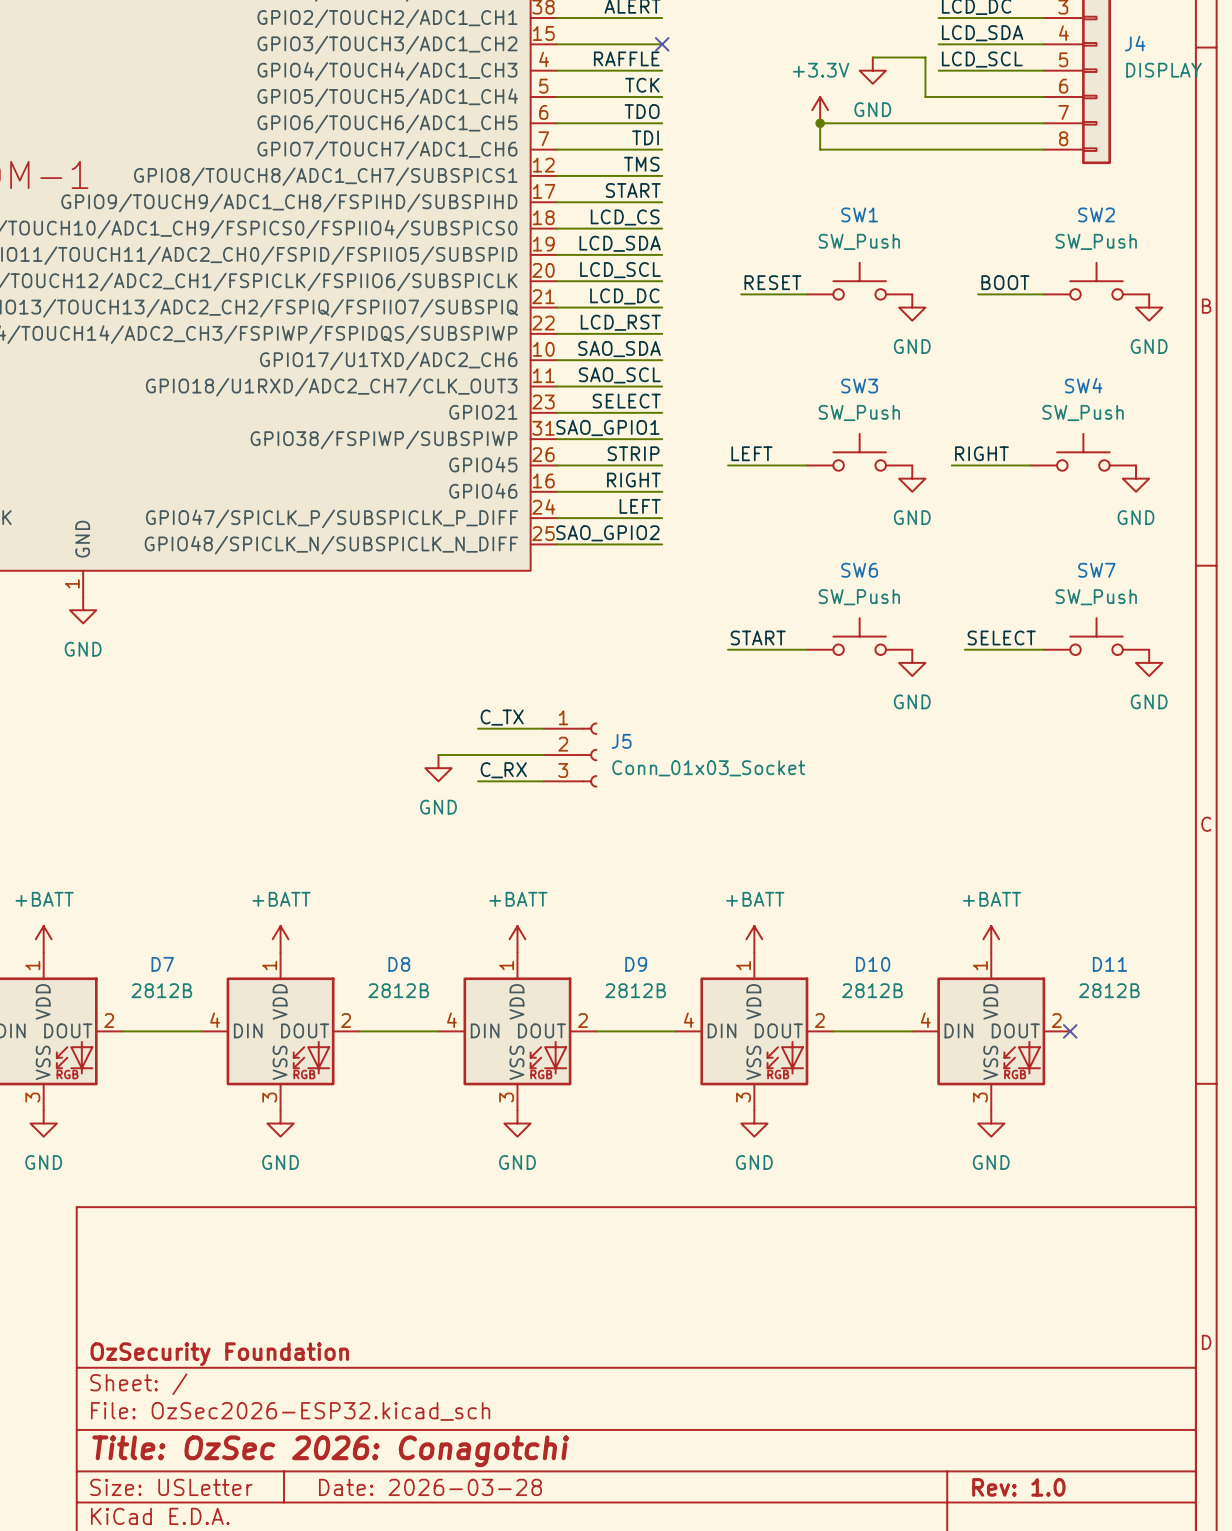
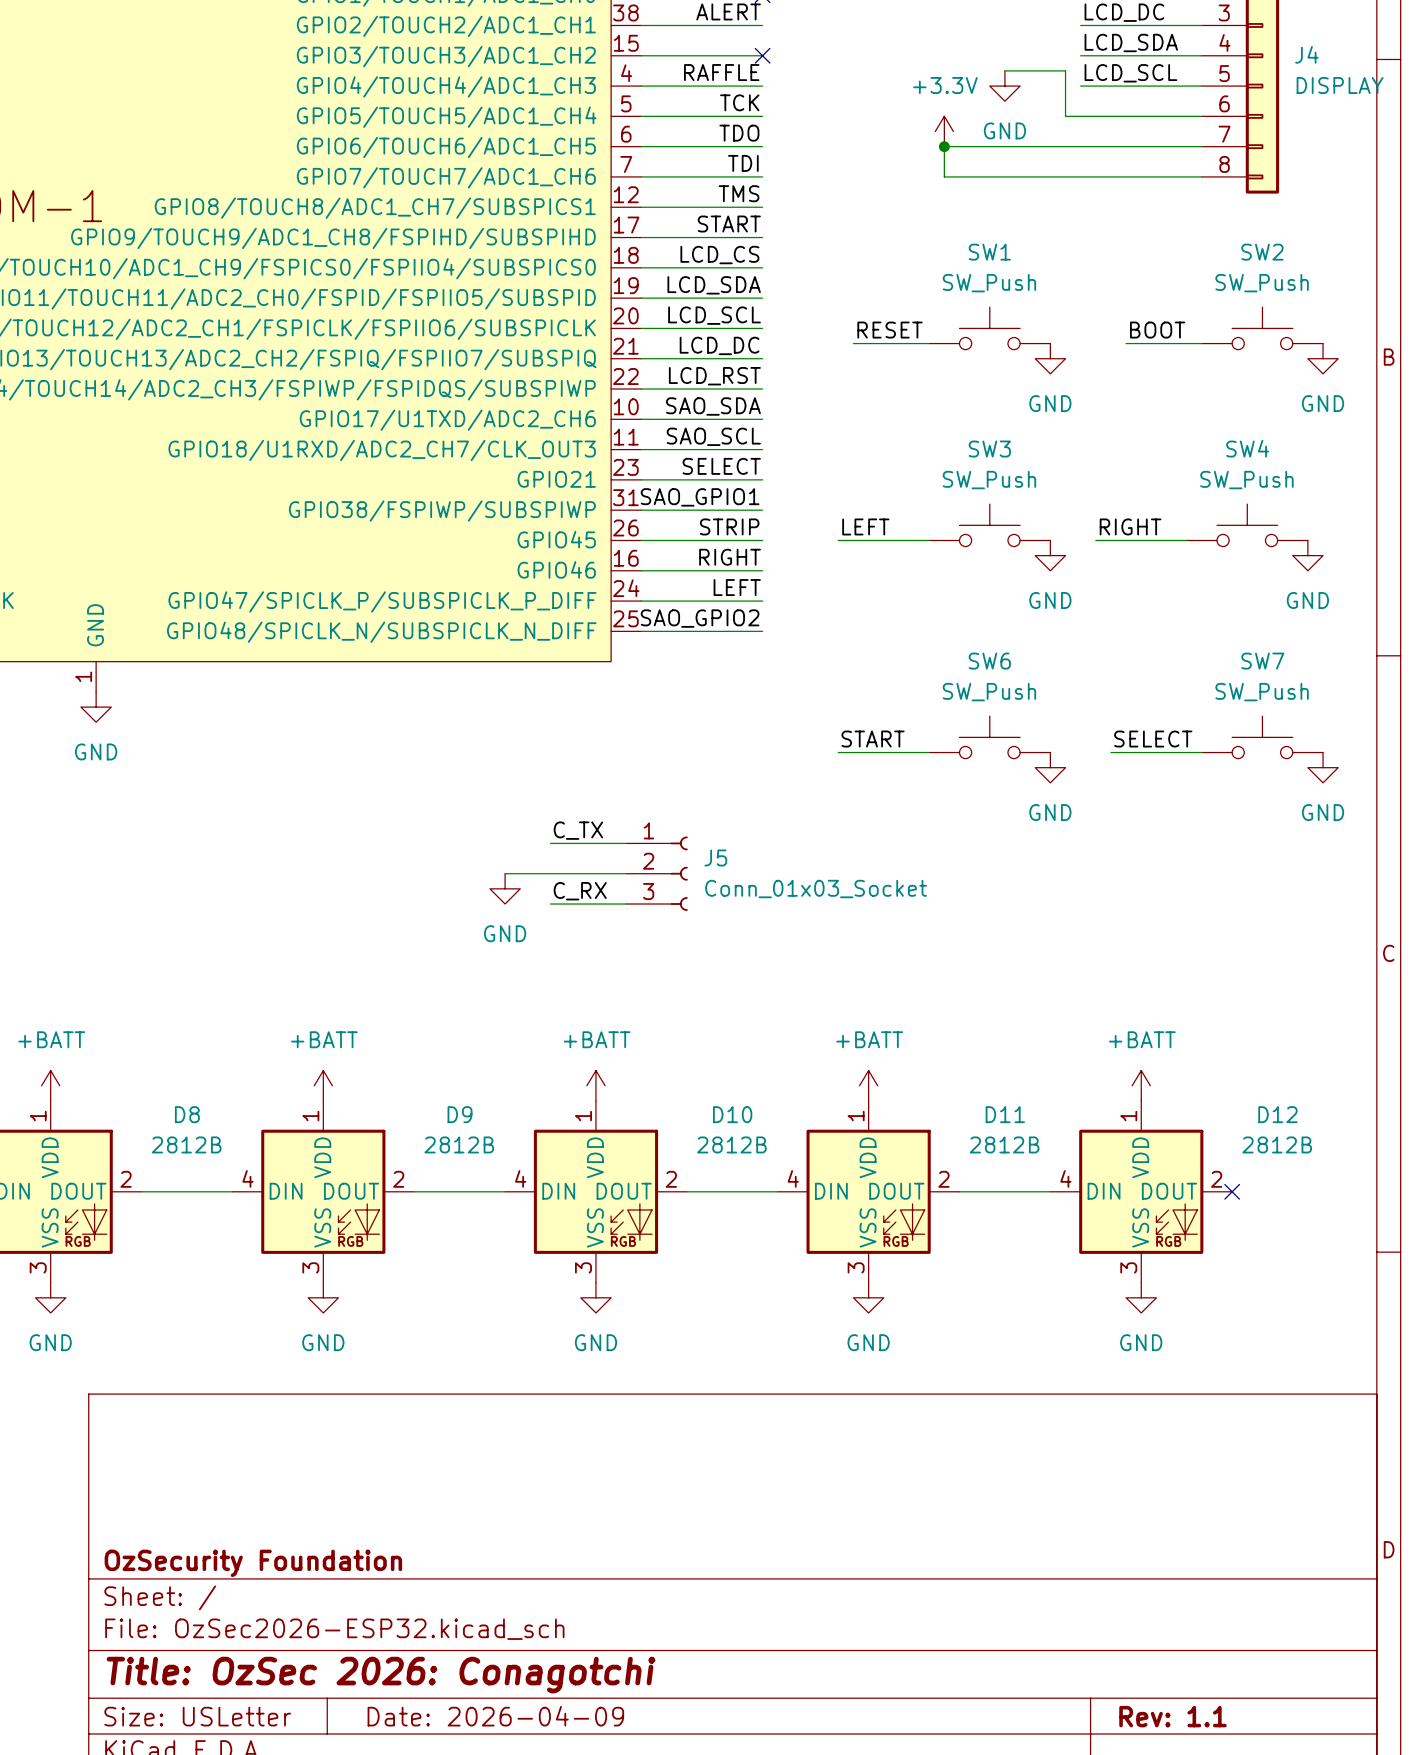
D7 name: D7 (162, 964) -> D8 (187, 1114)
D8 name: D8 (399, 964) -> D9 (460, 1114)
D9 name: D9 (636, 964) -> D10 (732, 1114)
D10 name: D10 (873, 964) -> D11 (1005, 1114)
D11 name: D11 (1110, 964) -> D12 (1277, 1114)
title block: Date: 2026-03-28 (430, 1487) -> Date: 2026-04-09 (495, 1716)
title block: Rev: 1.0 (1018, 1487) -> Rev: 1.1 (1173, 1716)

